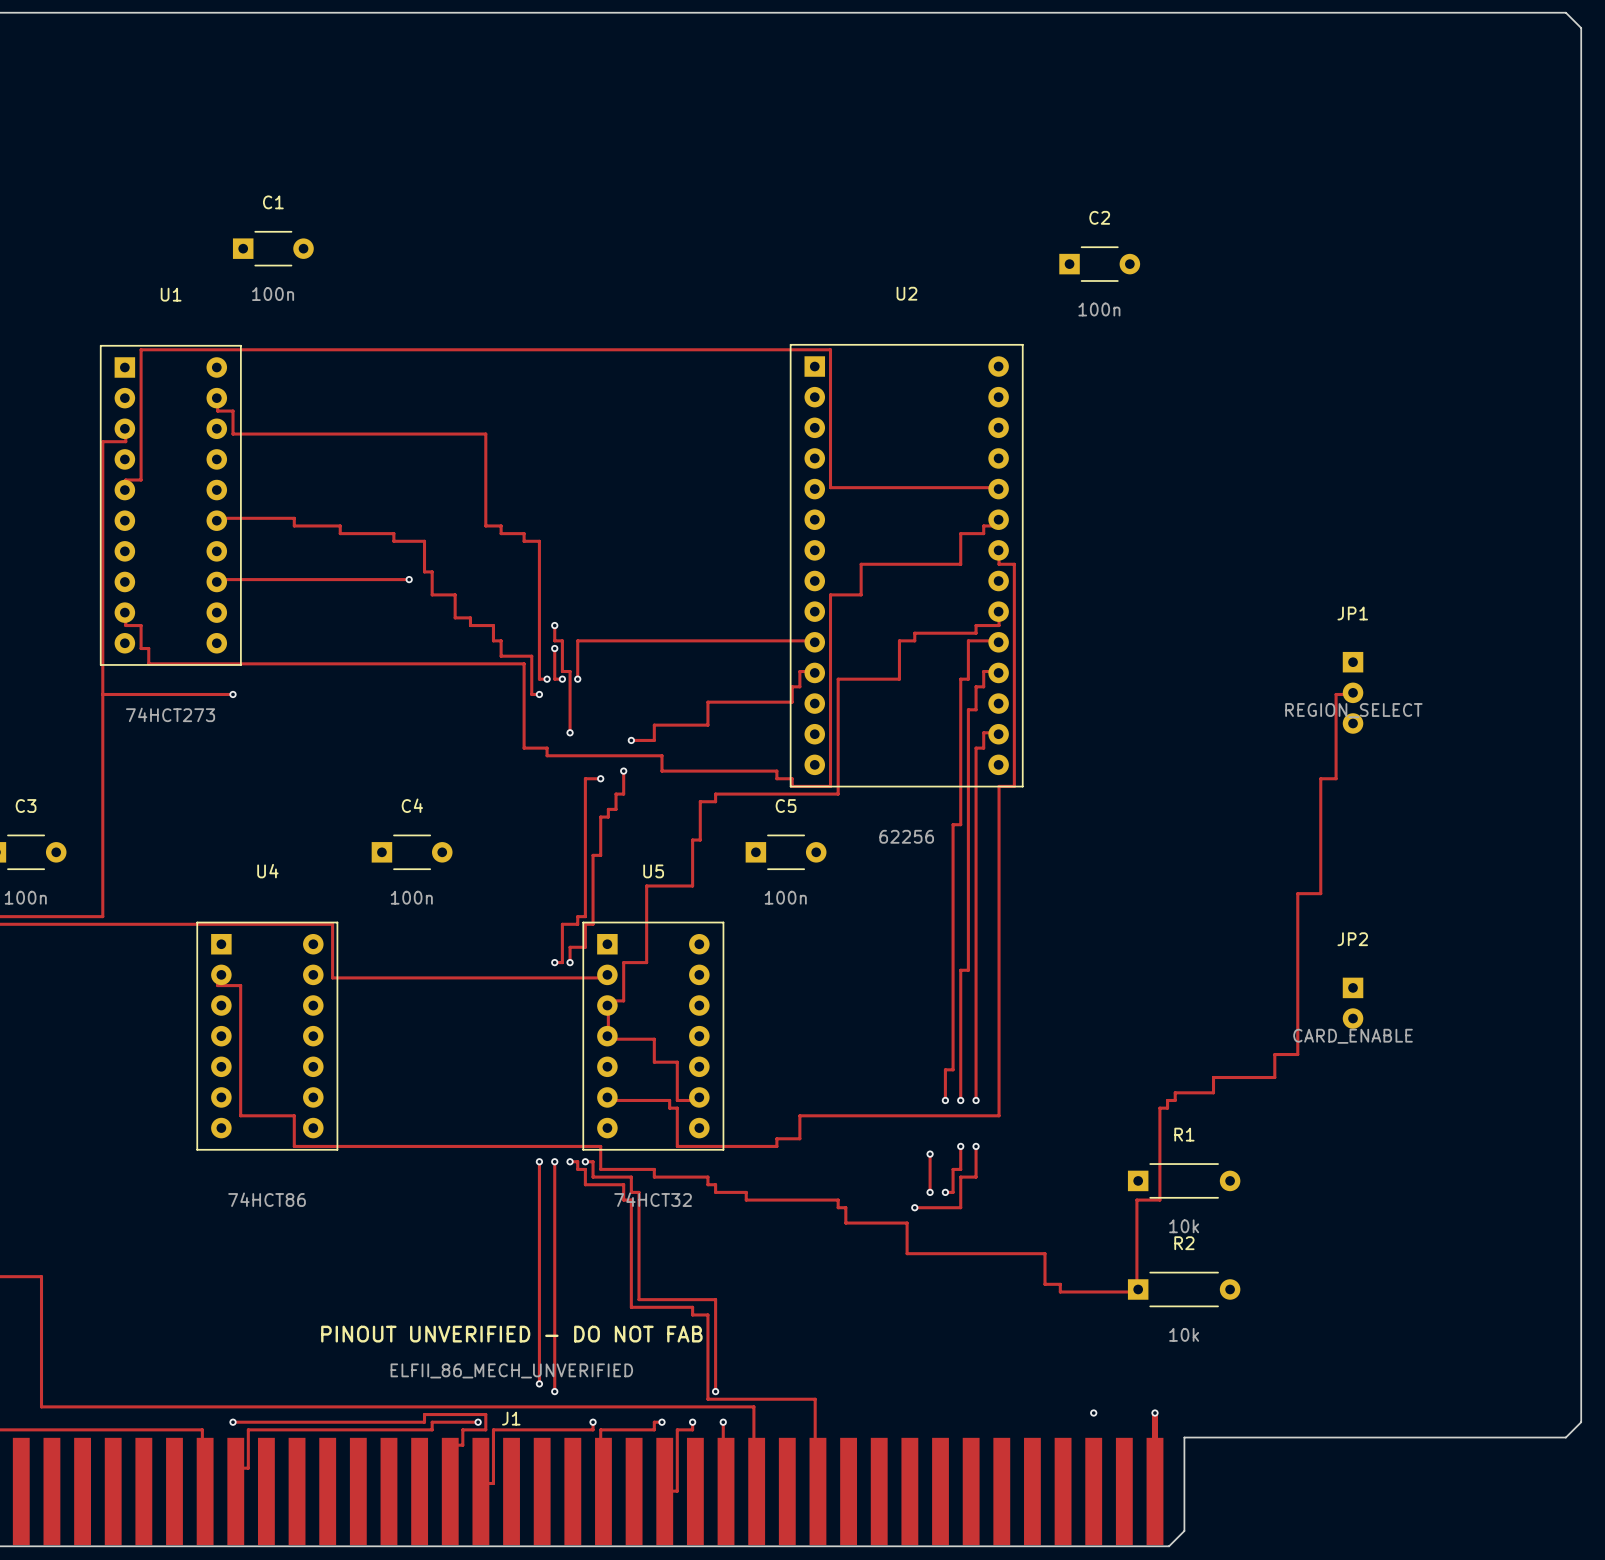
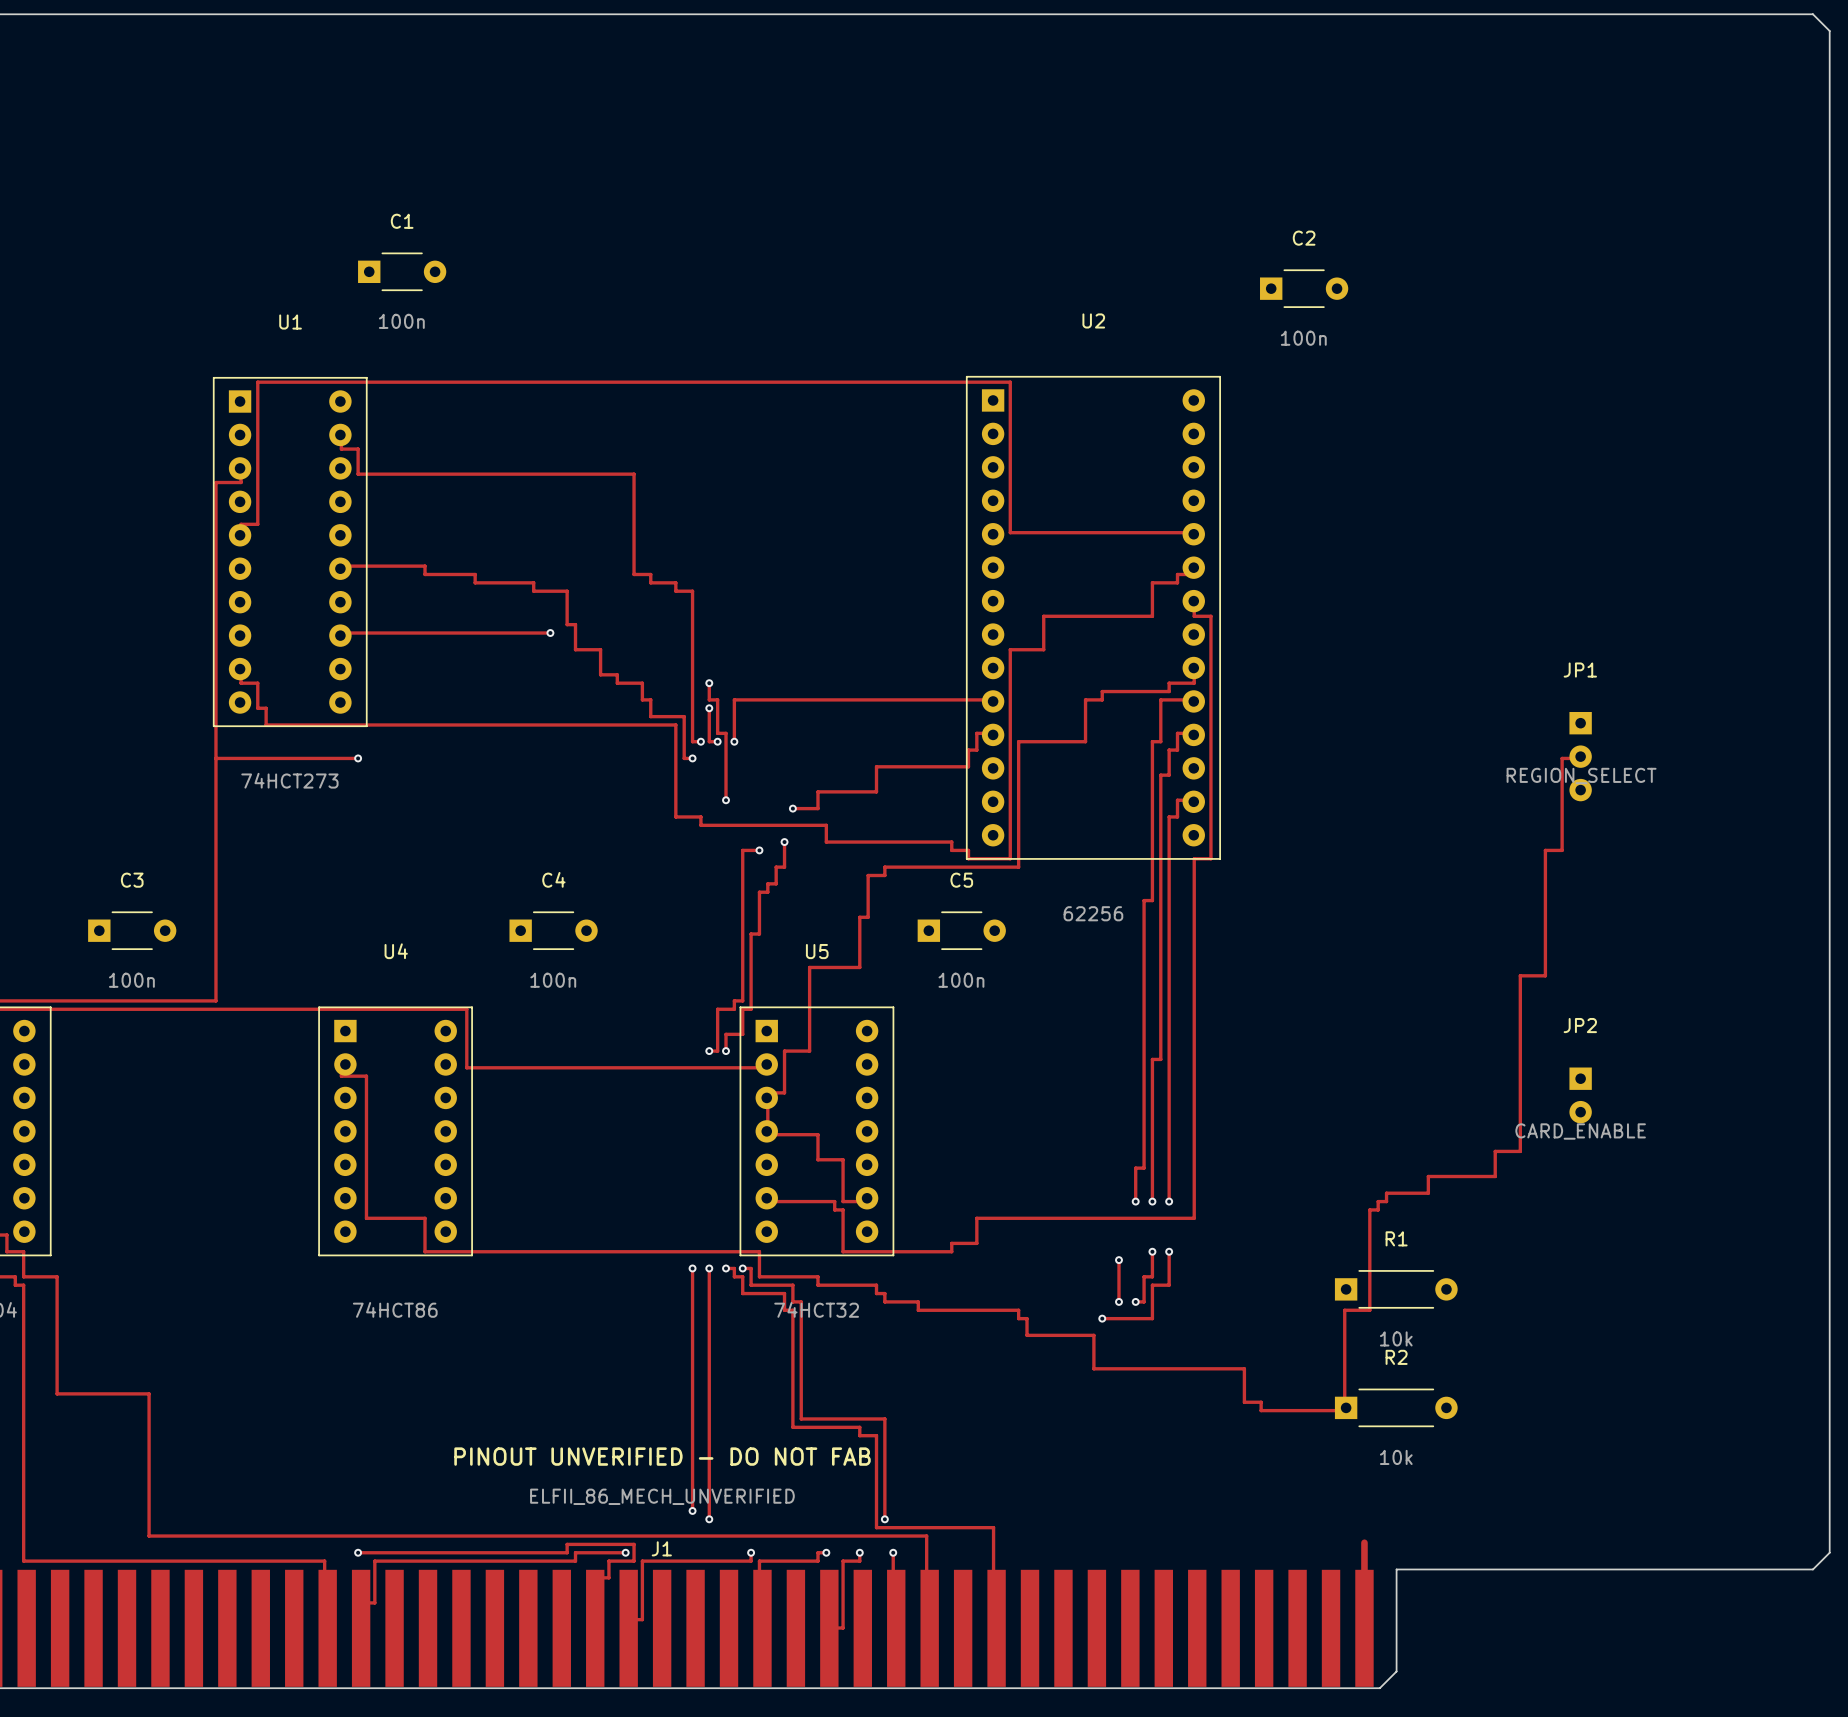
via: (1093, 1413) -> none
via: (1154, 1413) -> none

